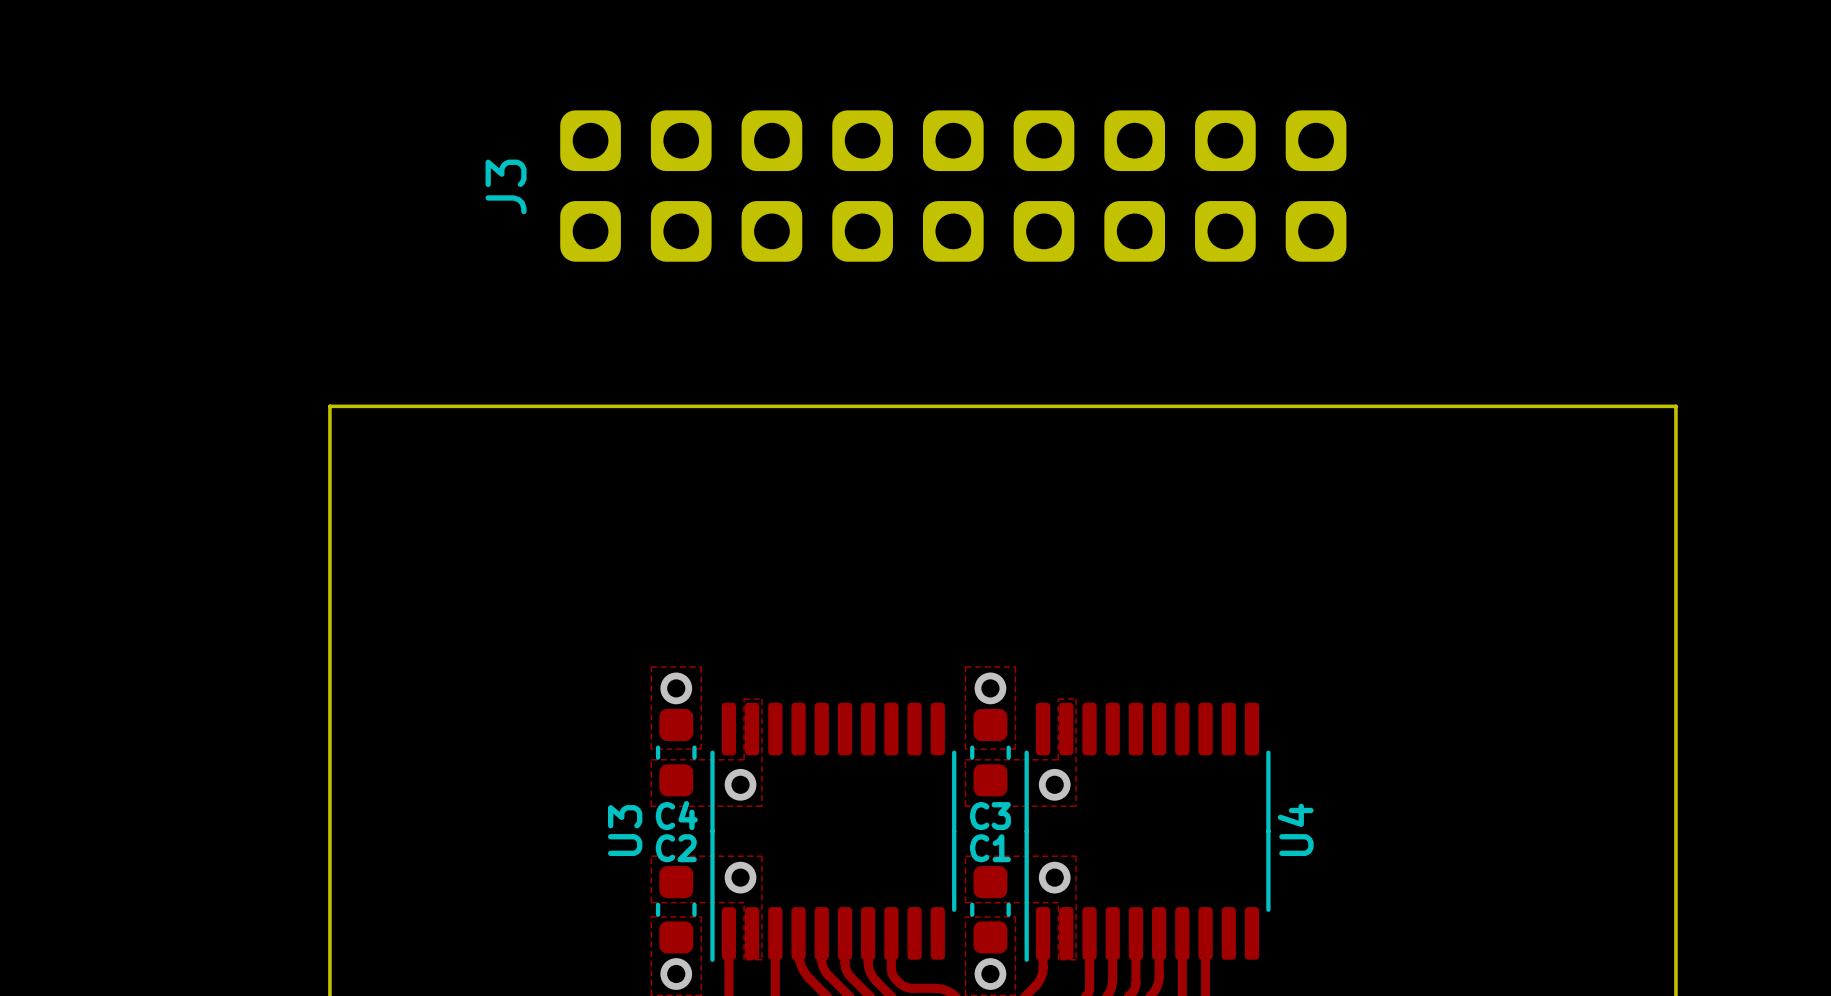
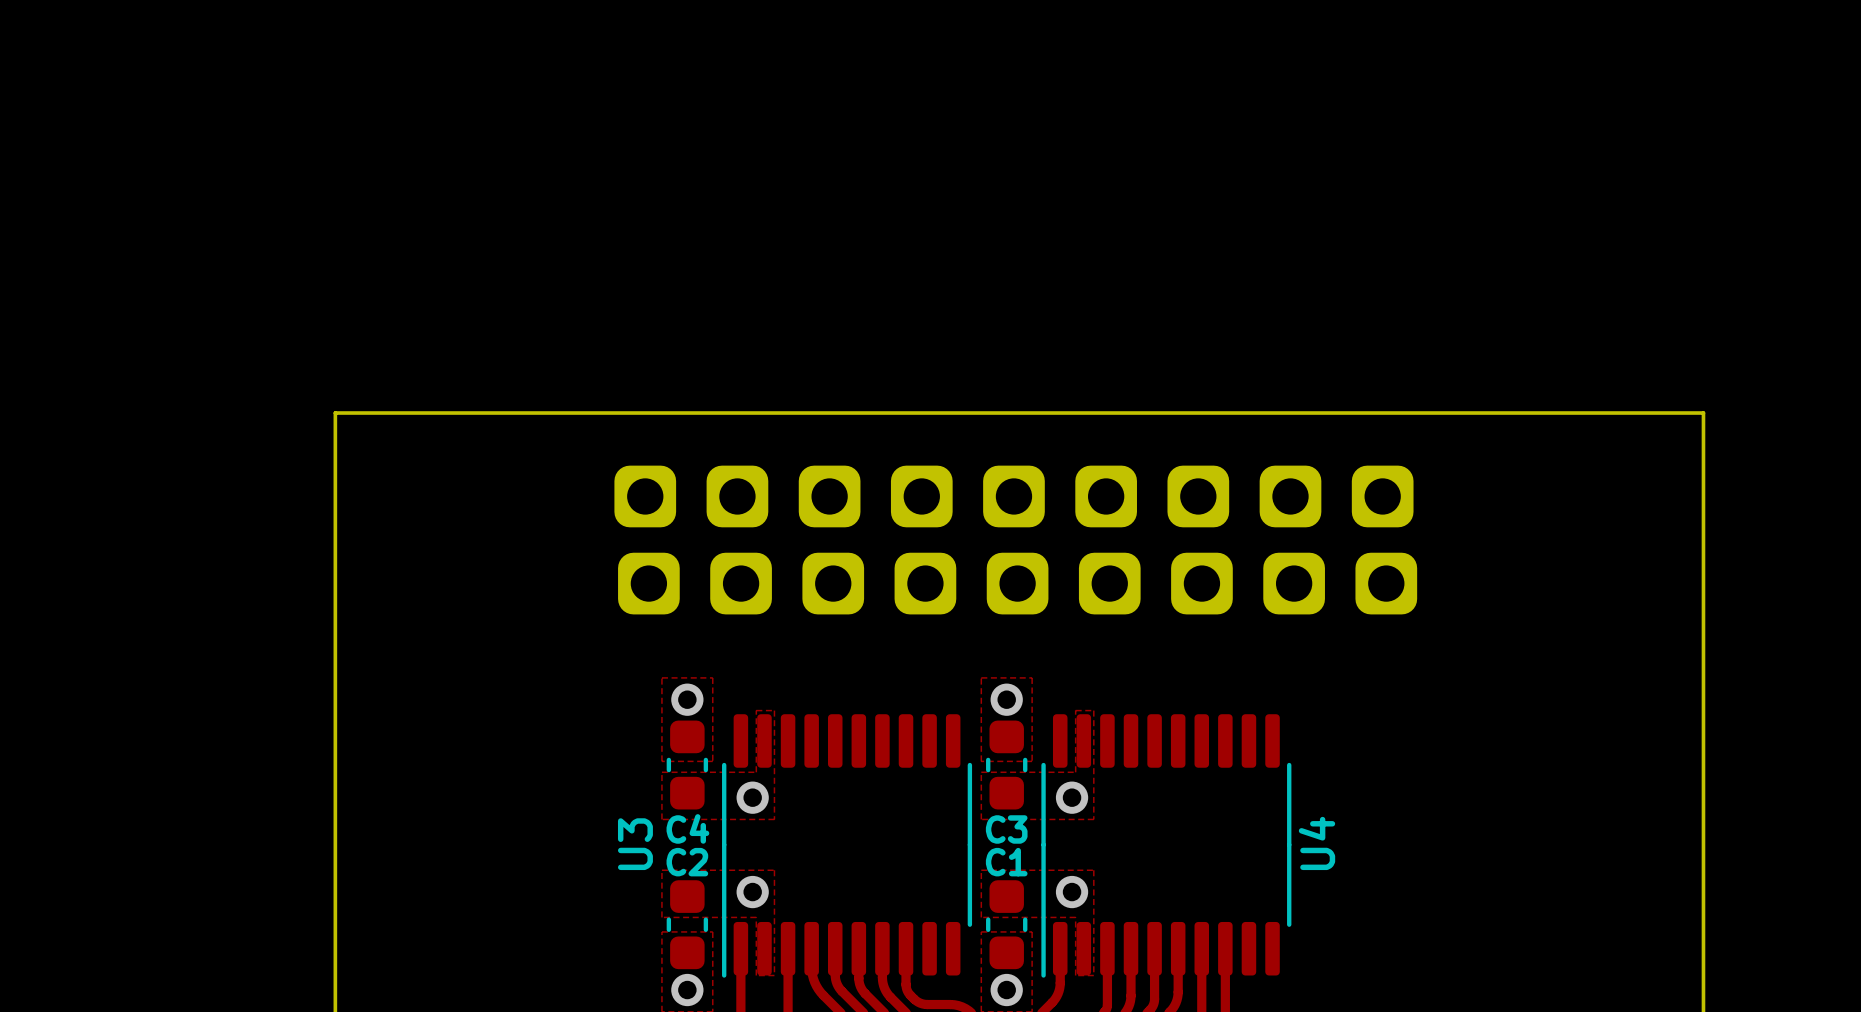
J3: (953, 186) -> none
part: none -> (1013, 496)
part: none -> (1017, 583)

